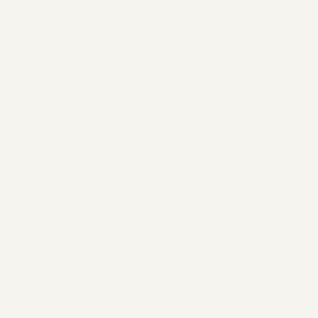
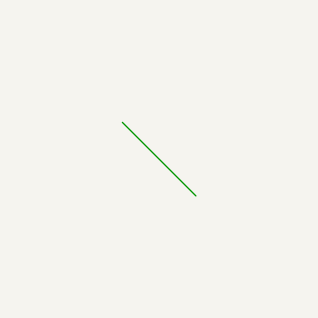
wire: none -> (122, 122) (195, 195)

